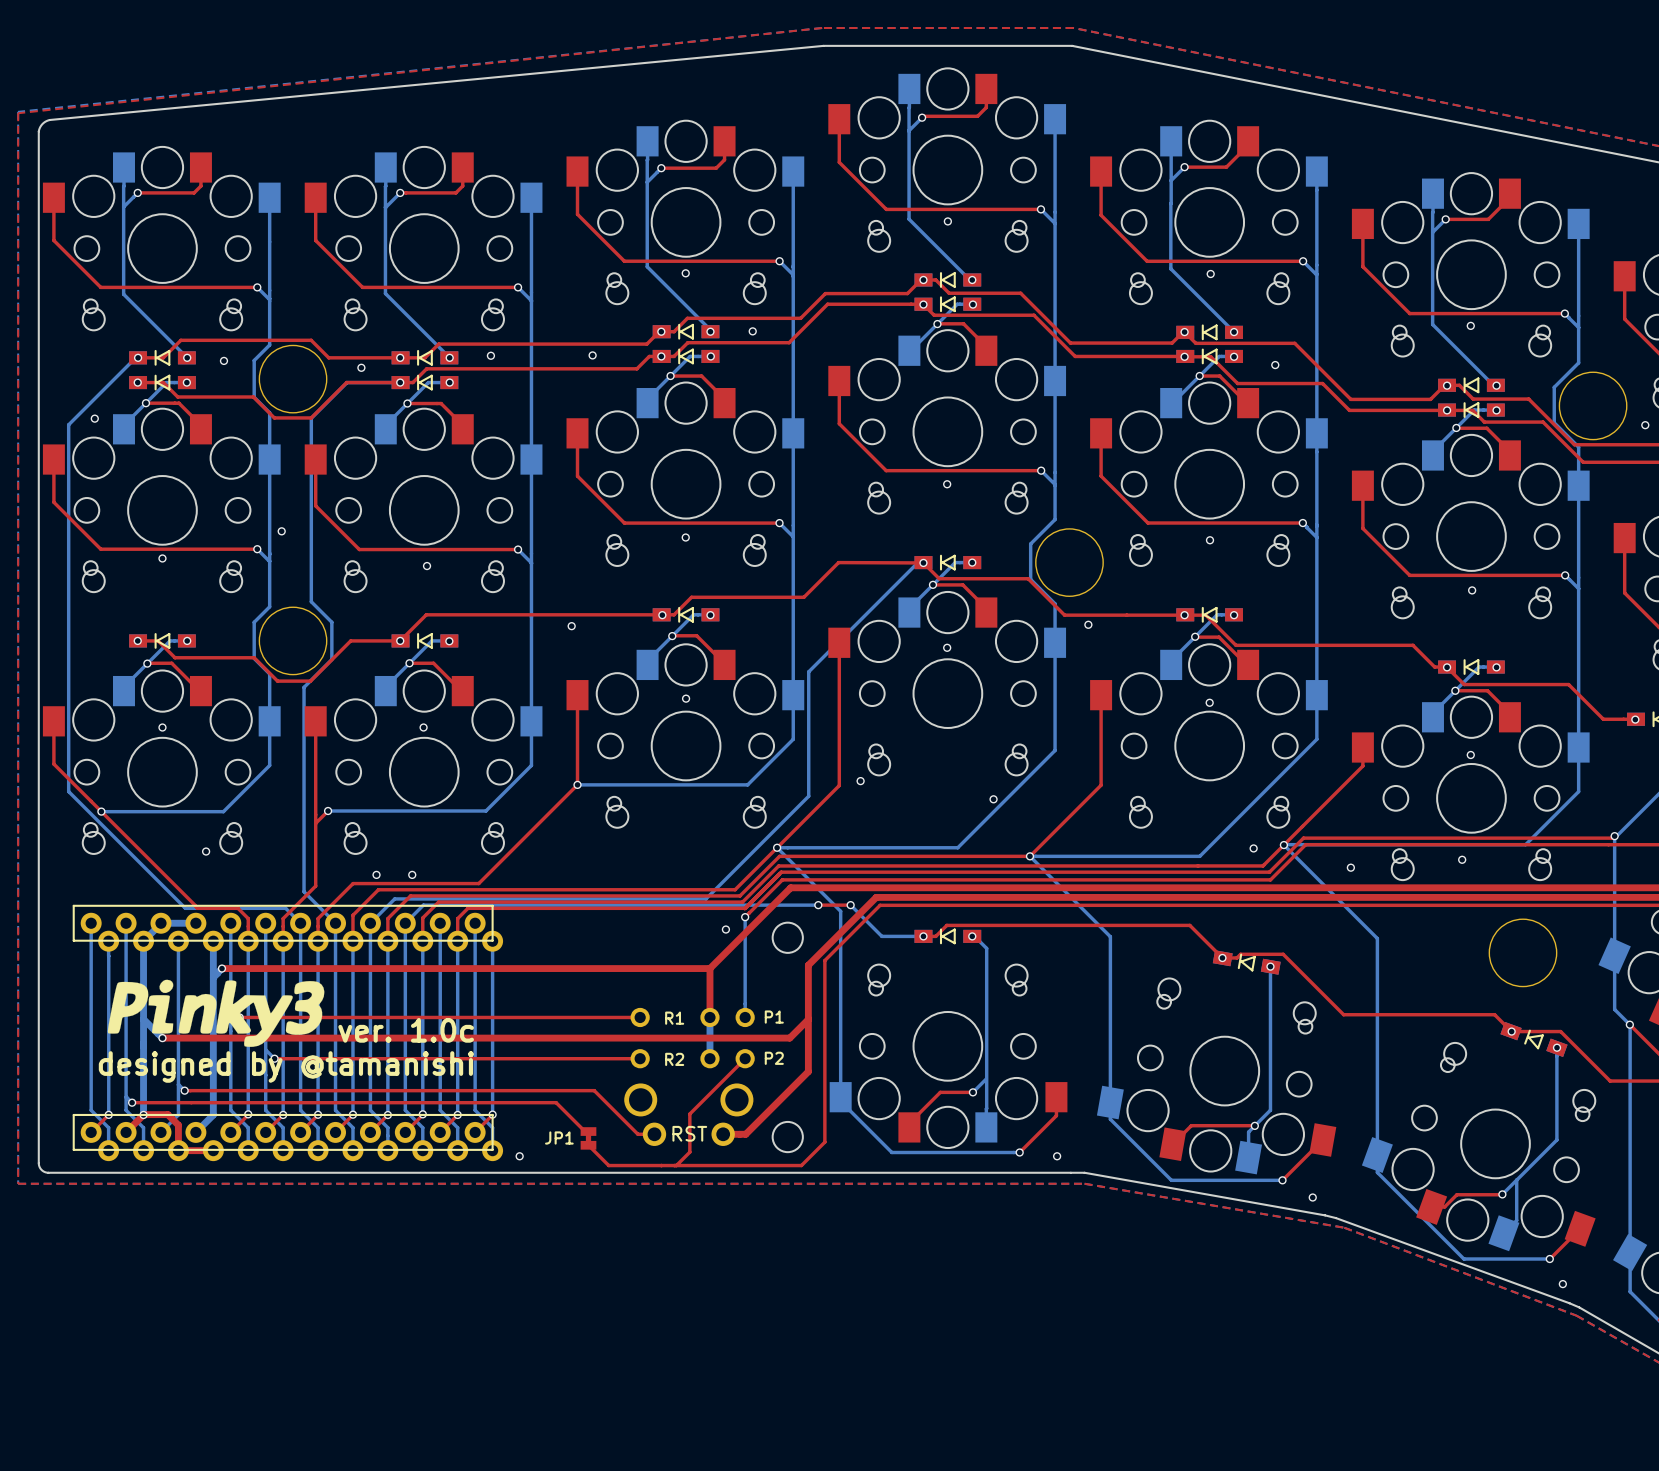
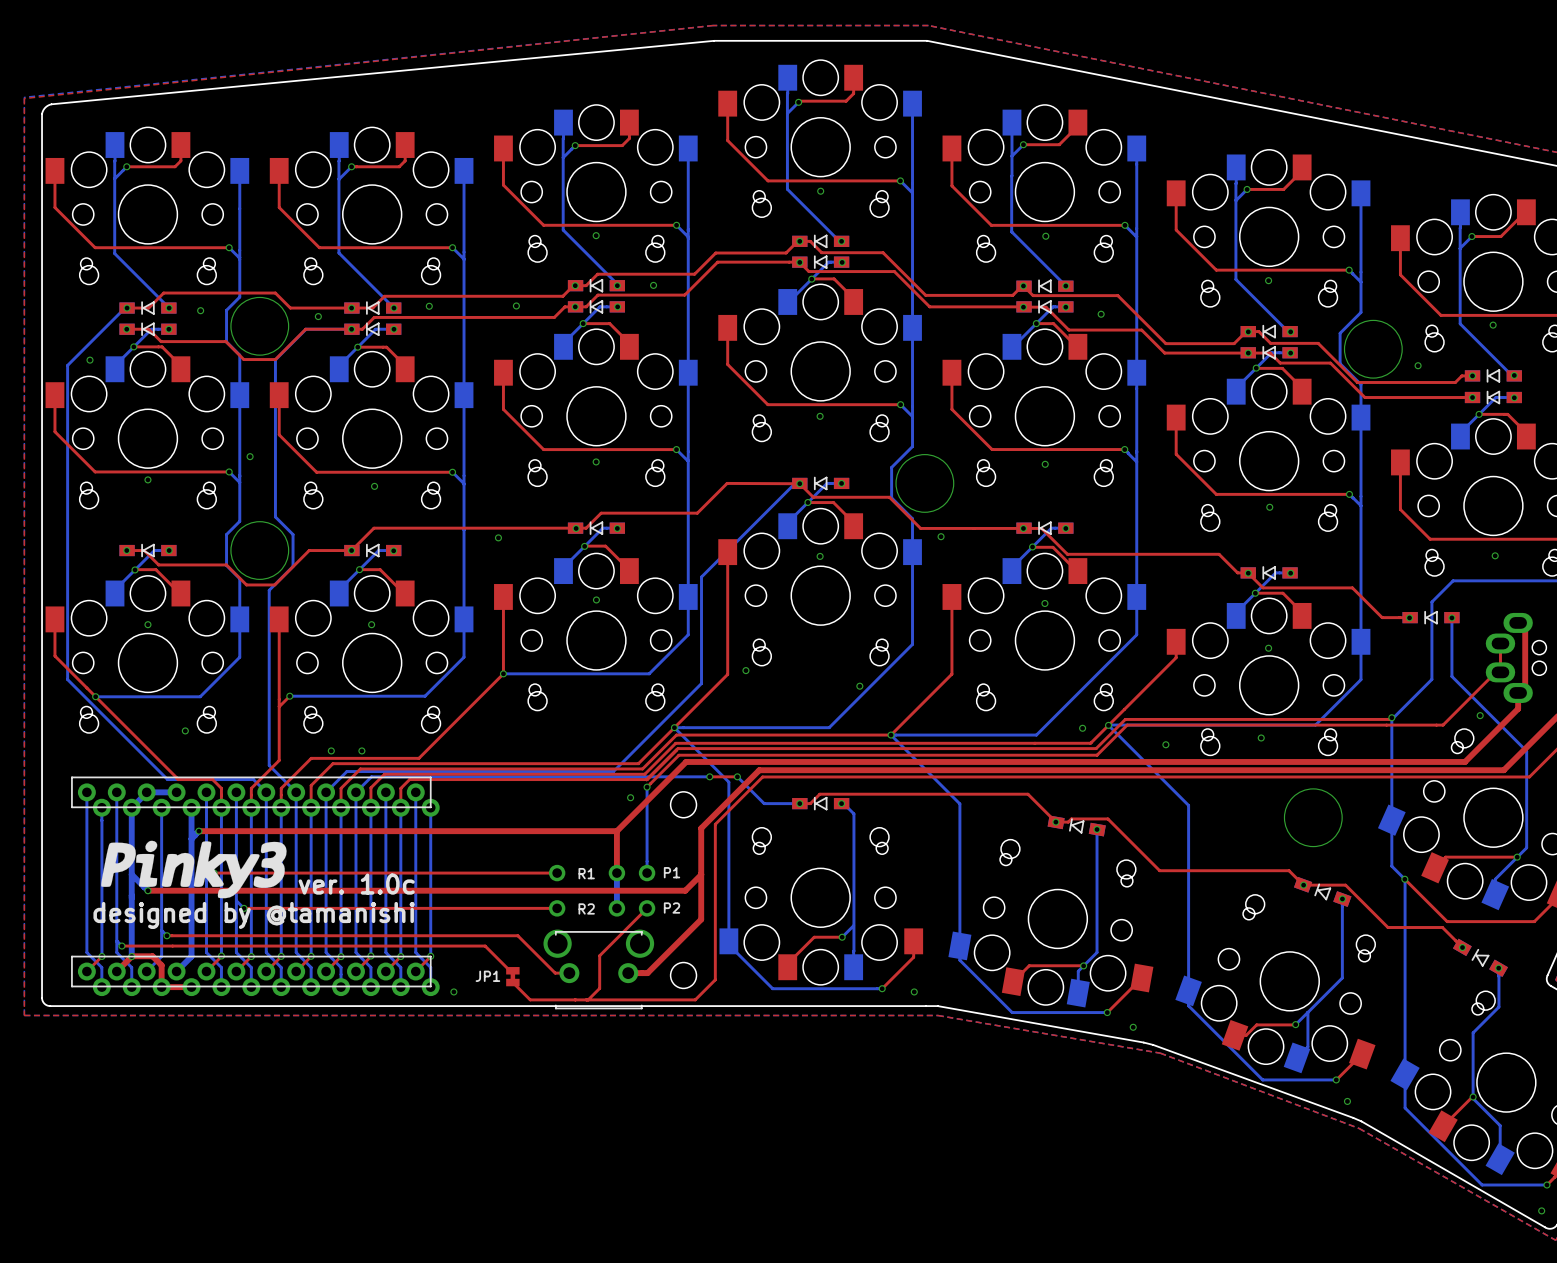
part: (688, 1114) -> none
part: none -> (598, 969)

